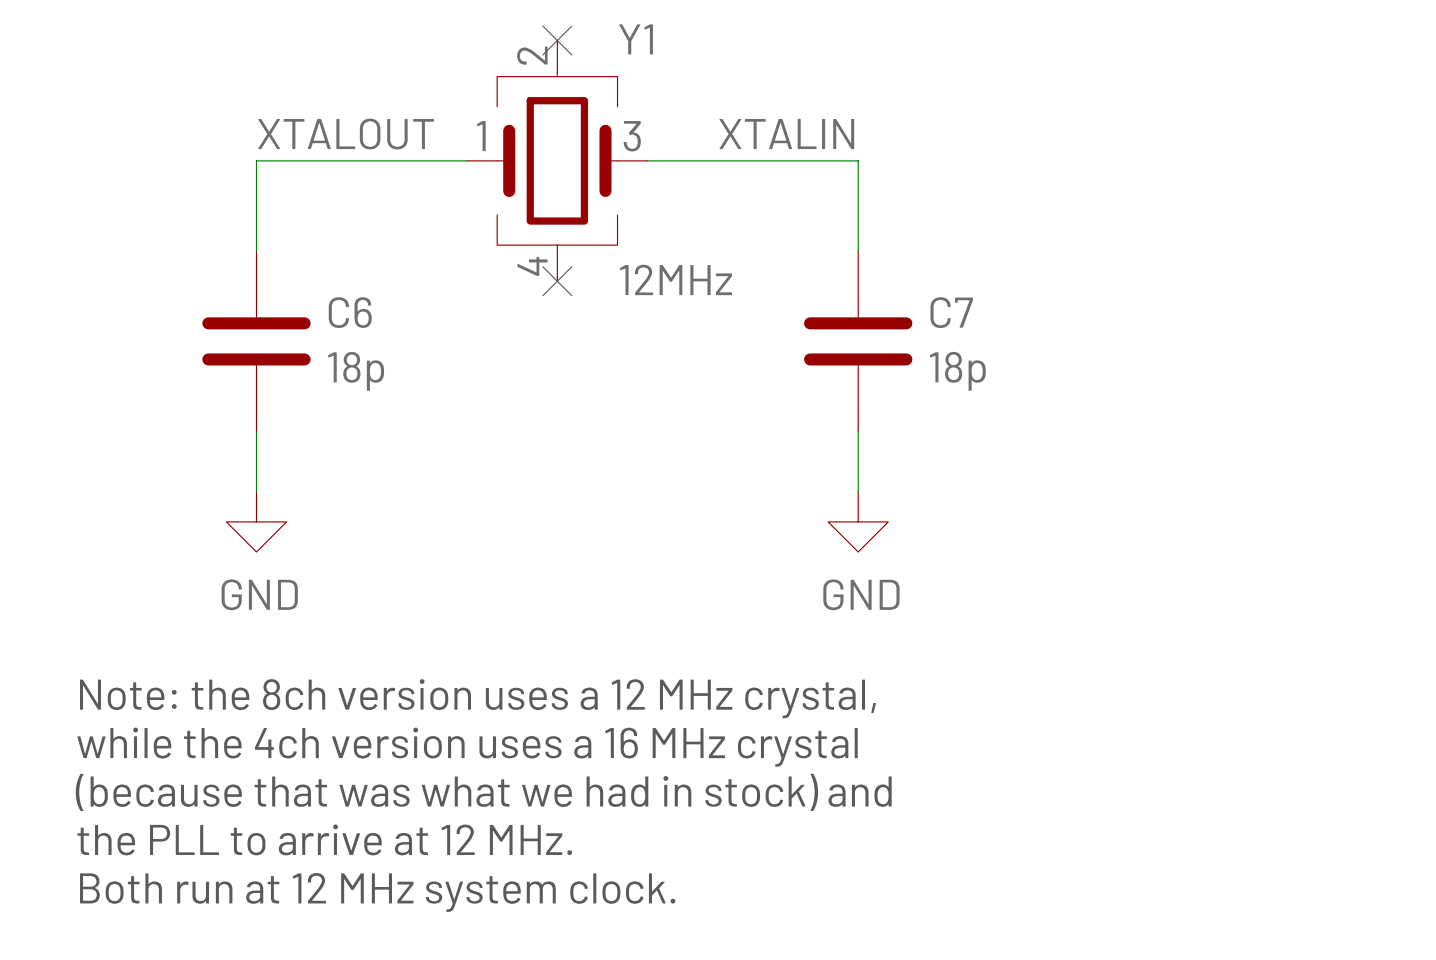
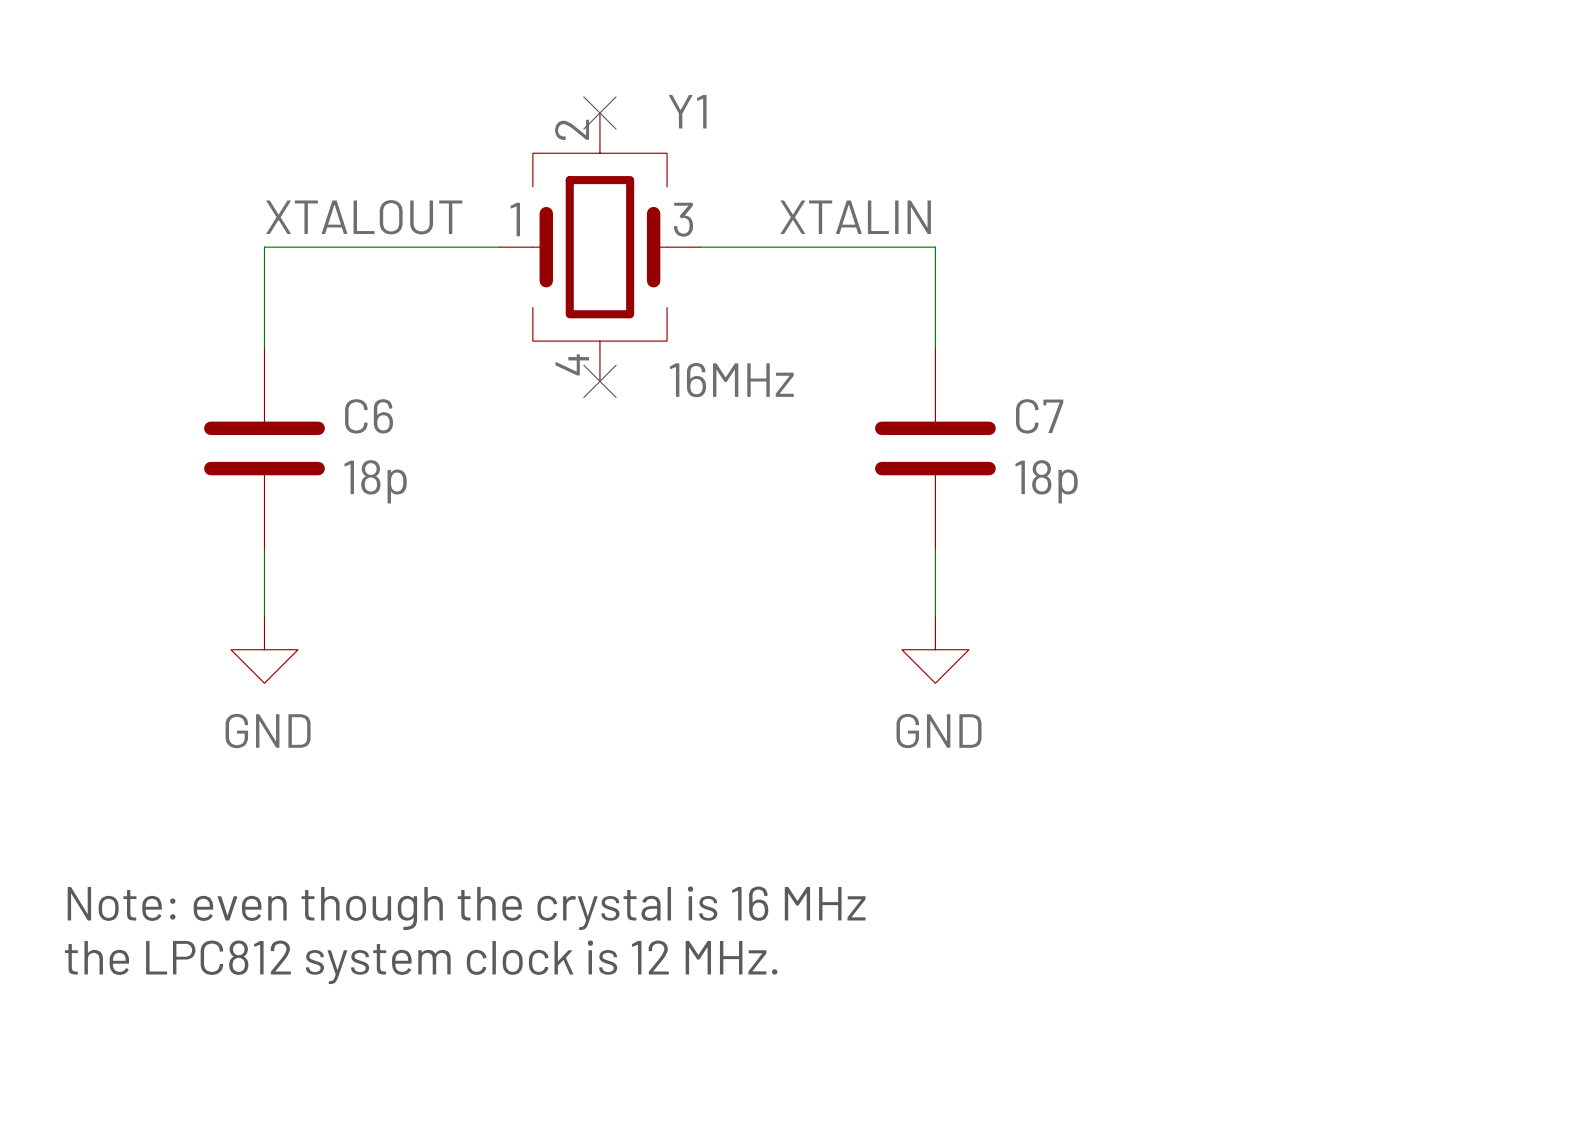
Y1 value: 12MHz (676, 279) -> 16MHz (731, 380)
text: Note: the 8ch version uses a 12 MHz crystal, (478, 698) -> none
text: while the 4ch version uses a 16 MHz crystal (467, 747) -> Note: even though the crystal is 16 MHz (466, 908)
text: (because that was what we had in stock) and (483, 792) -> the LPC812 system clock is 12 MHz. (421, 962)
text: the PLL to arrive at 12 MHz. (324, 839) -> none
text: Both run at 12 MHz system clock. (377, 892) -> none

